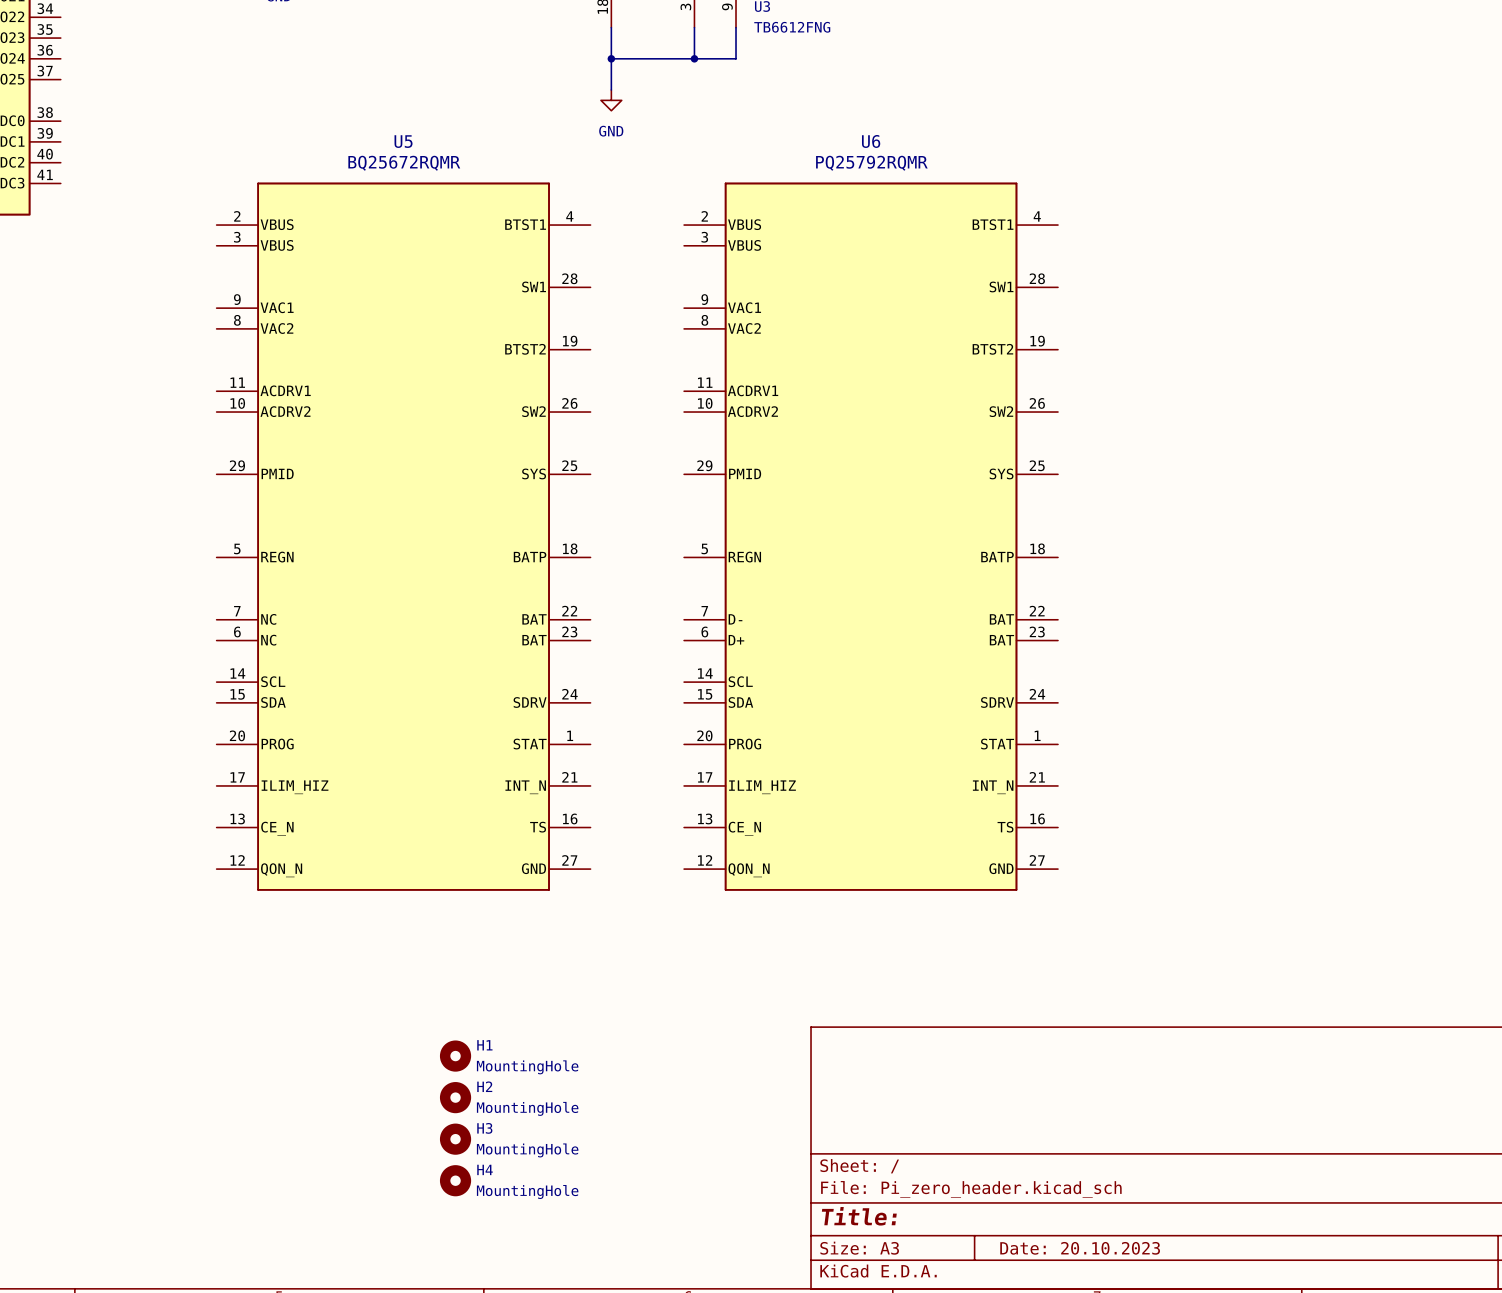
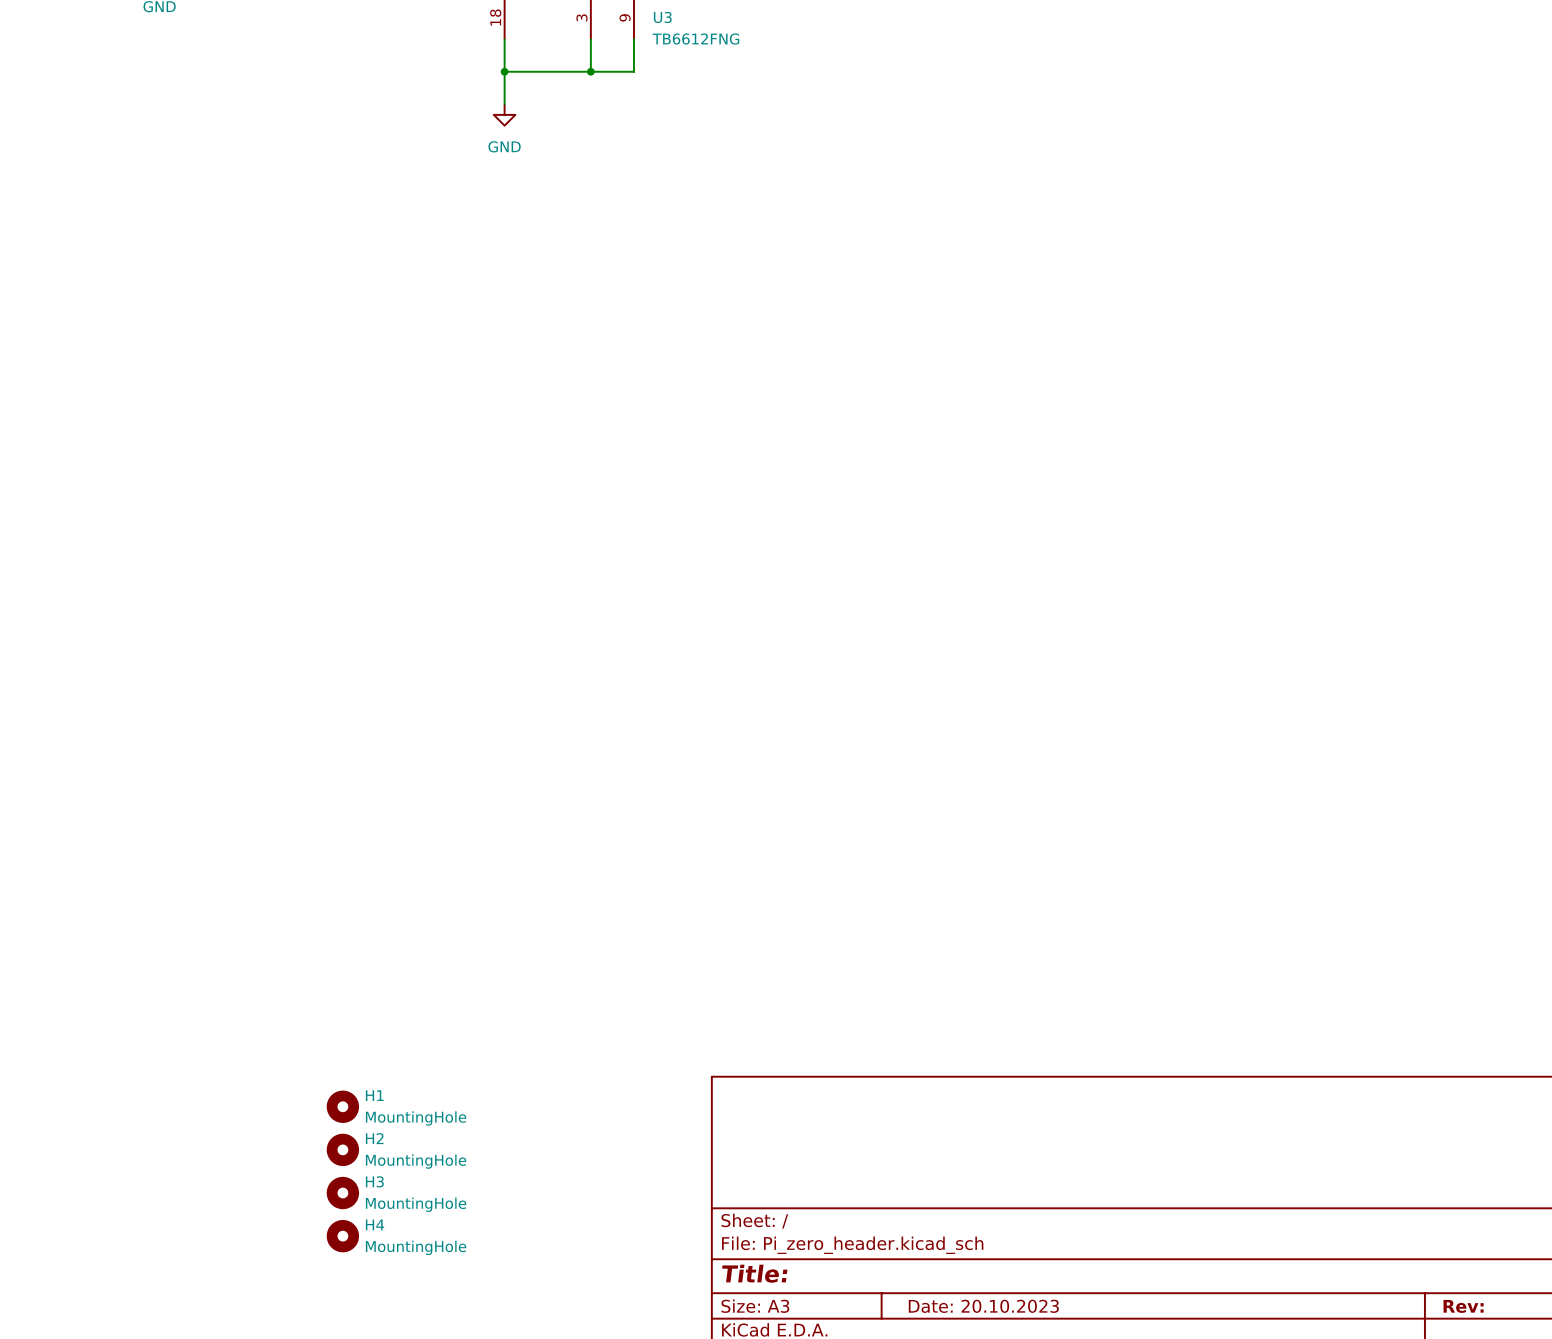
U5: BQ25672RQMR (403, 536) -> none
U6: PQ25792RQMR (871, 536) -> none

